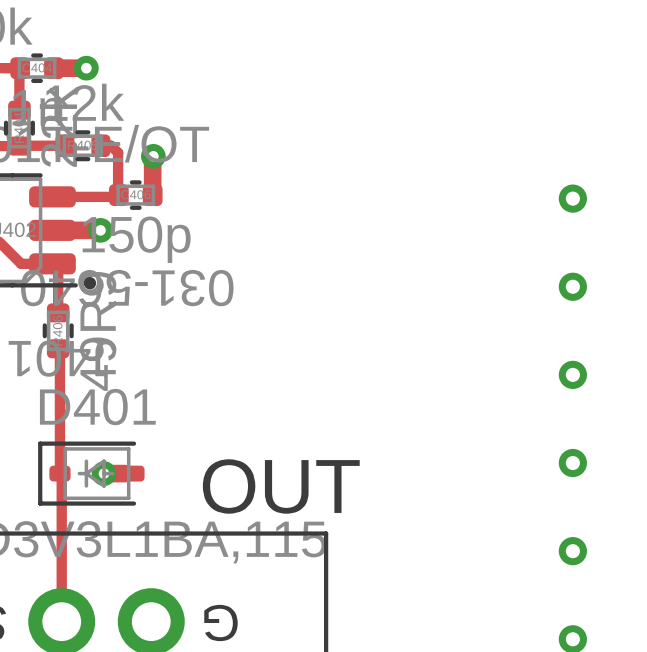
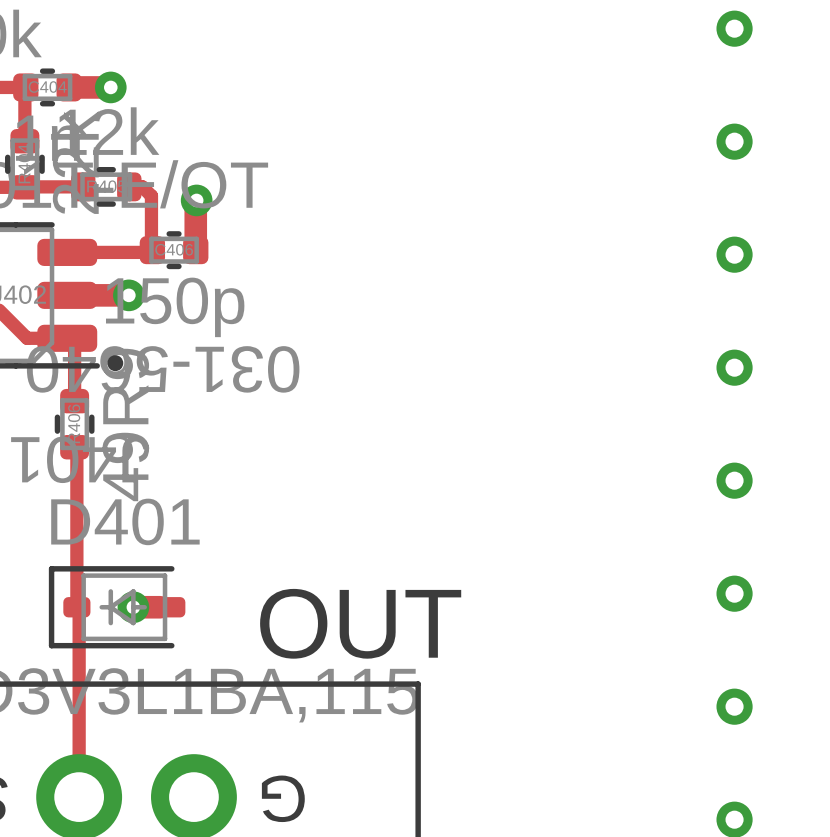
via: none -> (734, 28)
via: none -> (734, 141)

